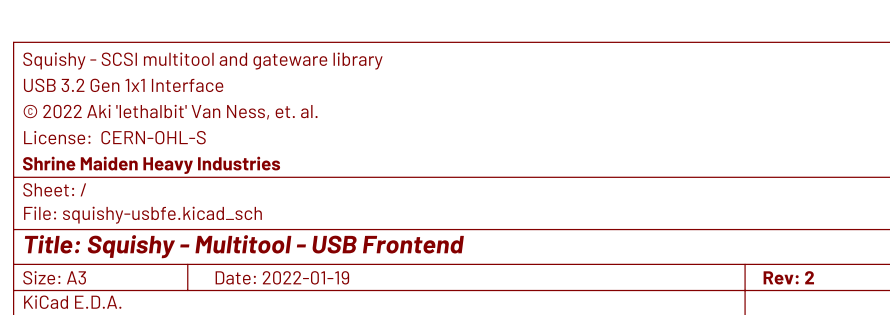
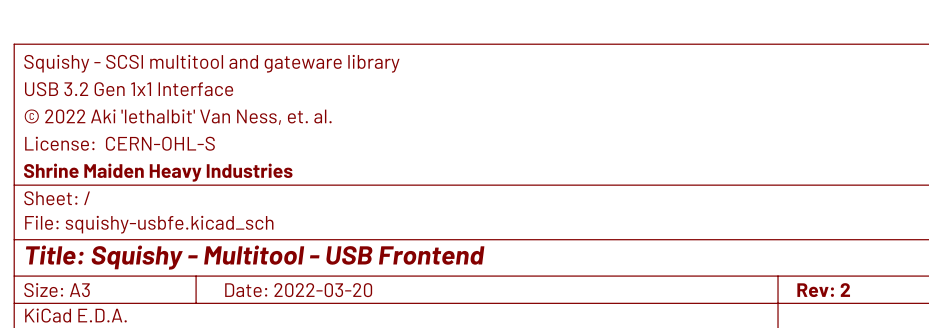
title block: Date: 2022-01-19 (282, 277) -> Date: 2022-03-20 (298, 290)

